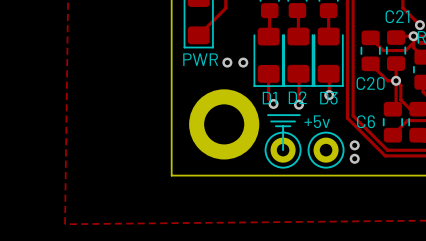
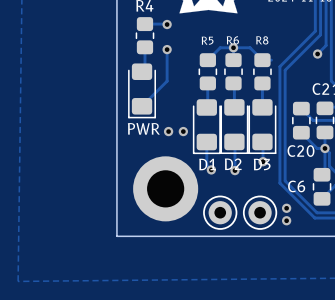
line: (267, 115) (299, 115) -> none
line: (271, 121) (295, 121) -> none
text: +5v (317, 121) -> none
line: (275, 126) (290, 126) -> none
line: (283, 126) (283, 150) -> none

